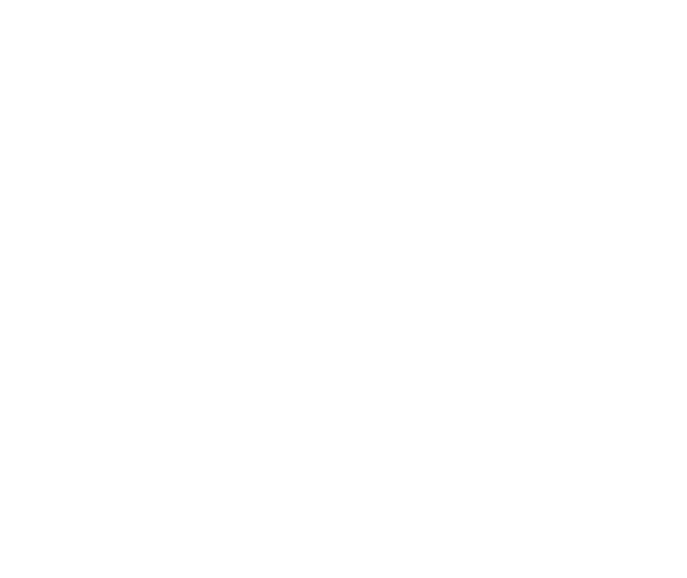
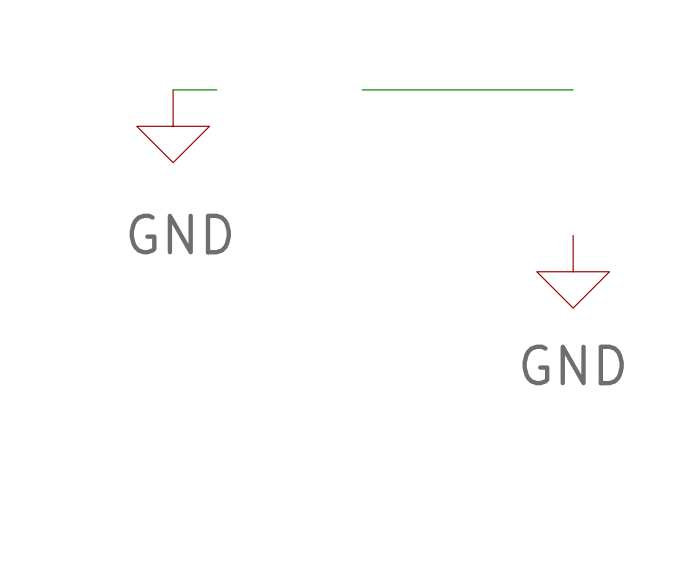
wire: none -> (173, 89) (216, 89)
wire: none -> (362, 89) (573, 89)
power symbol: none -> GND (173, 126)
power symbol: none -> GND (573, 271)

